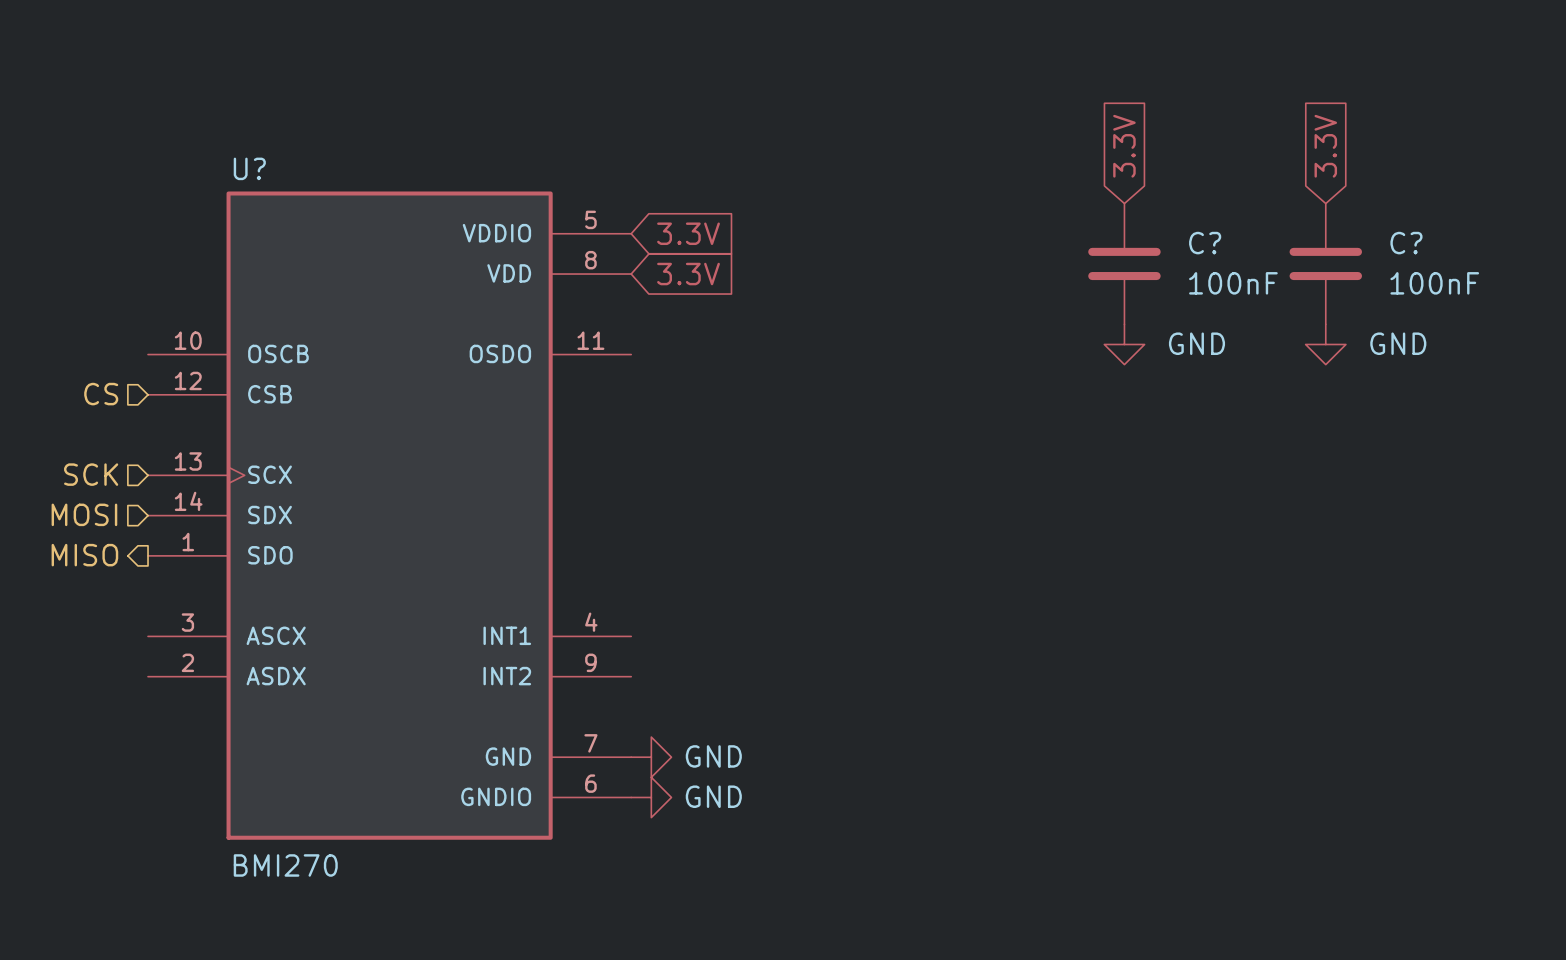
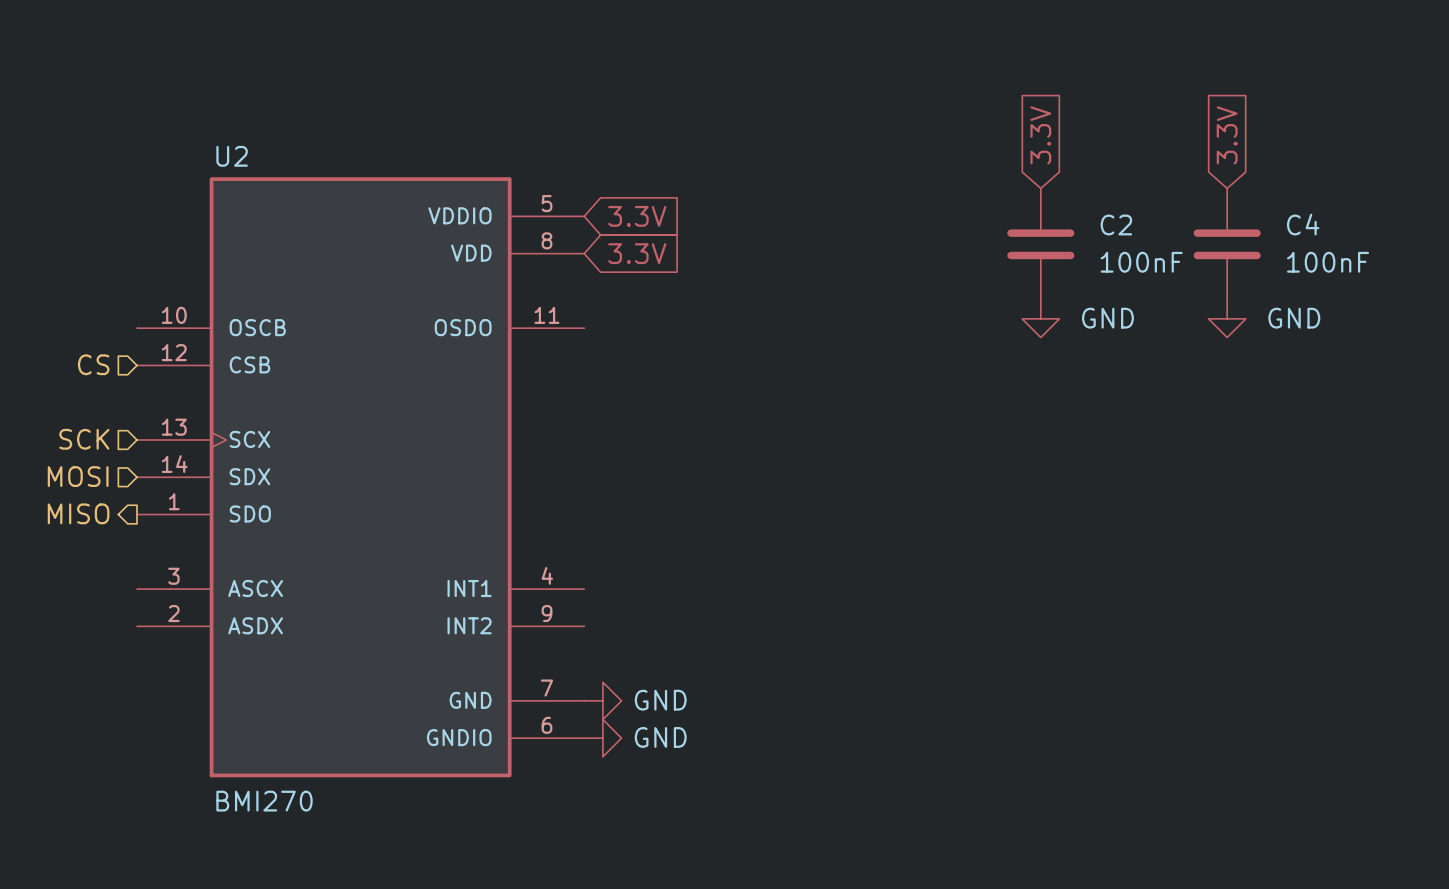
U? name: U? (249, 168) -> U2 (232, 156)
C? name: C? (1205, 243) -> C2 (1116, 224)
C? name: C? (1406, 243) -> C4 (1303, 224)

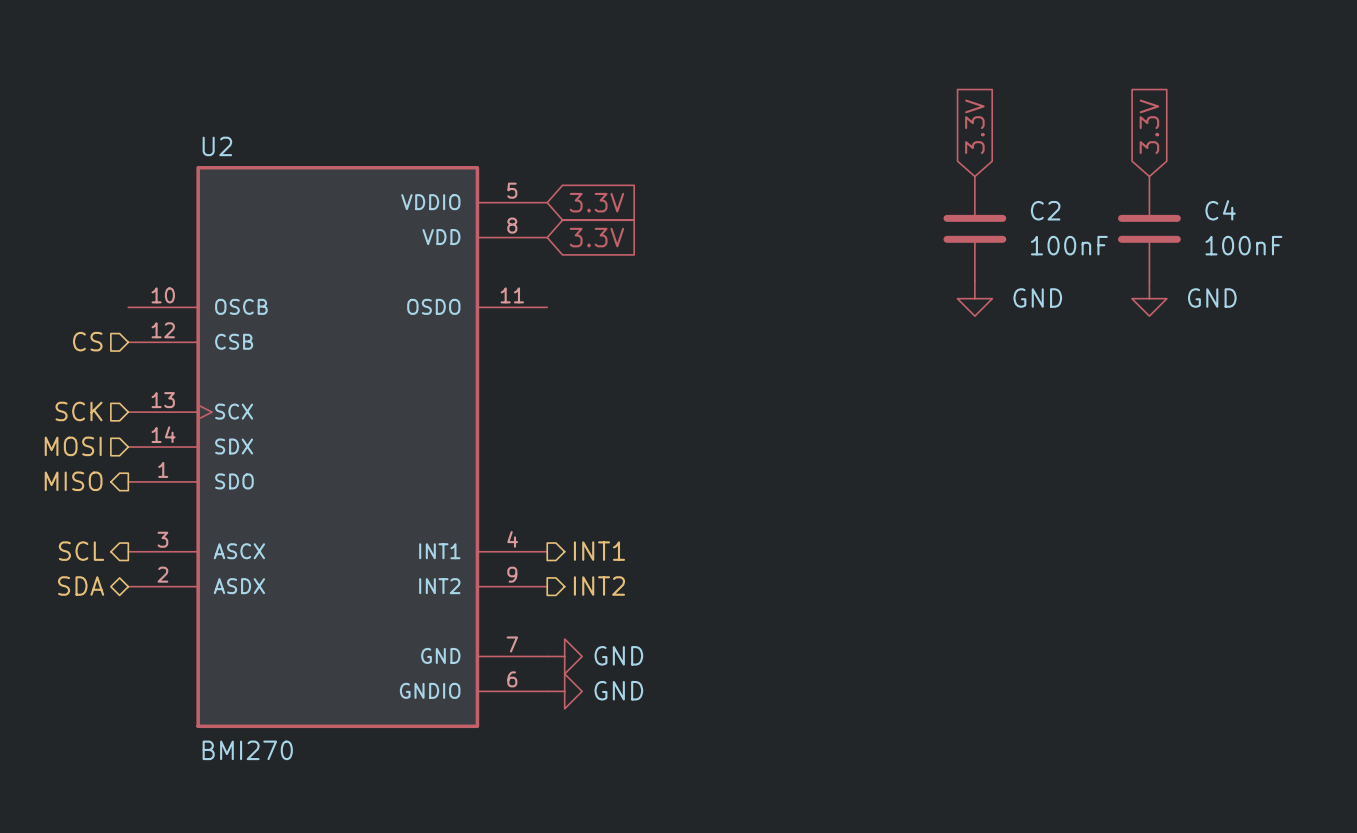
hierarchical label: none -> SCL (81, 551)
hierarchical label: none -> INT1 (599, 551)
hierarchical label: none -> SDA (81, 586)
hierarchical label: none -> INT2 (599, 586)

